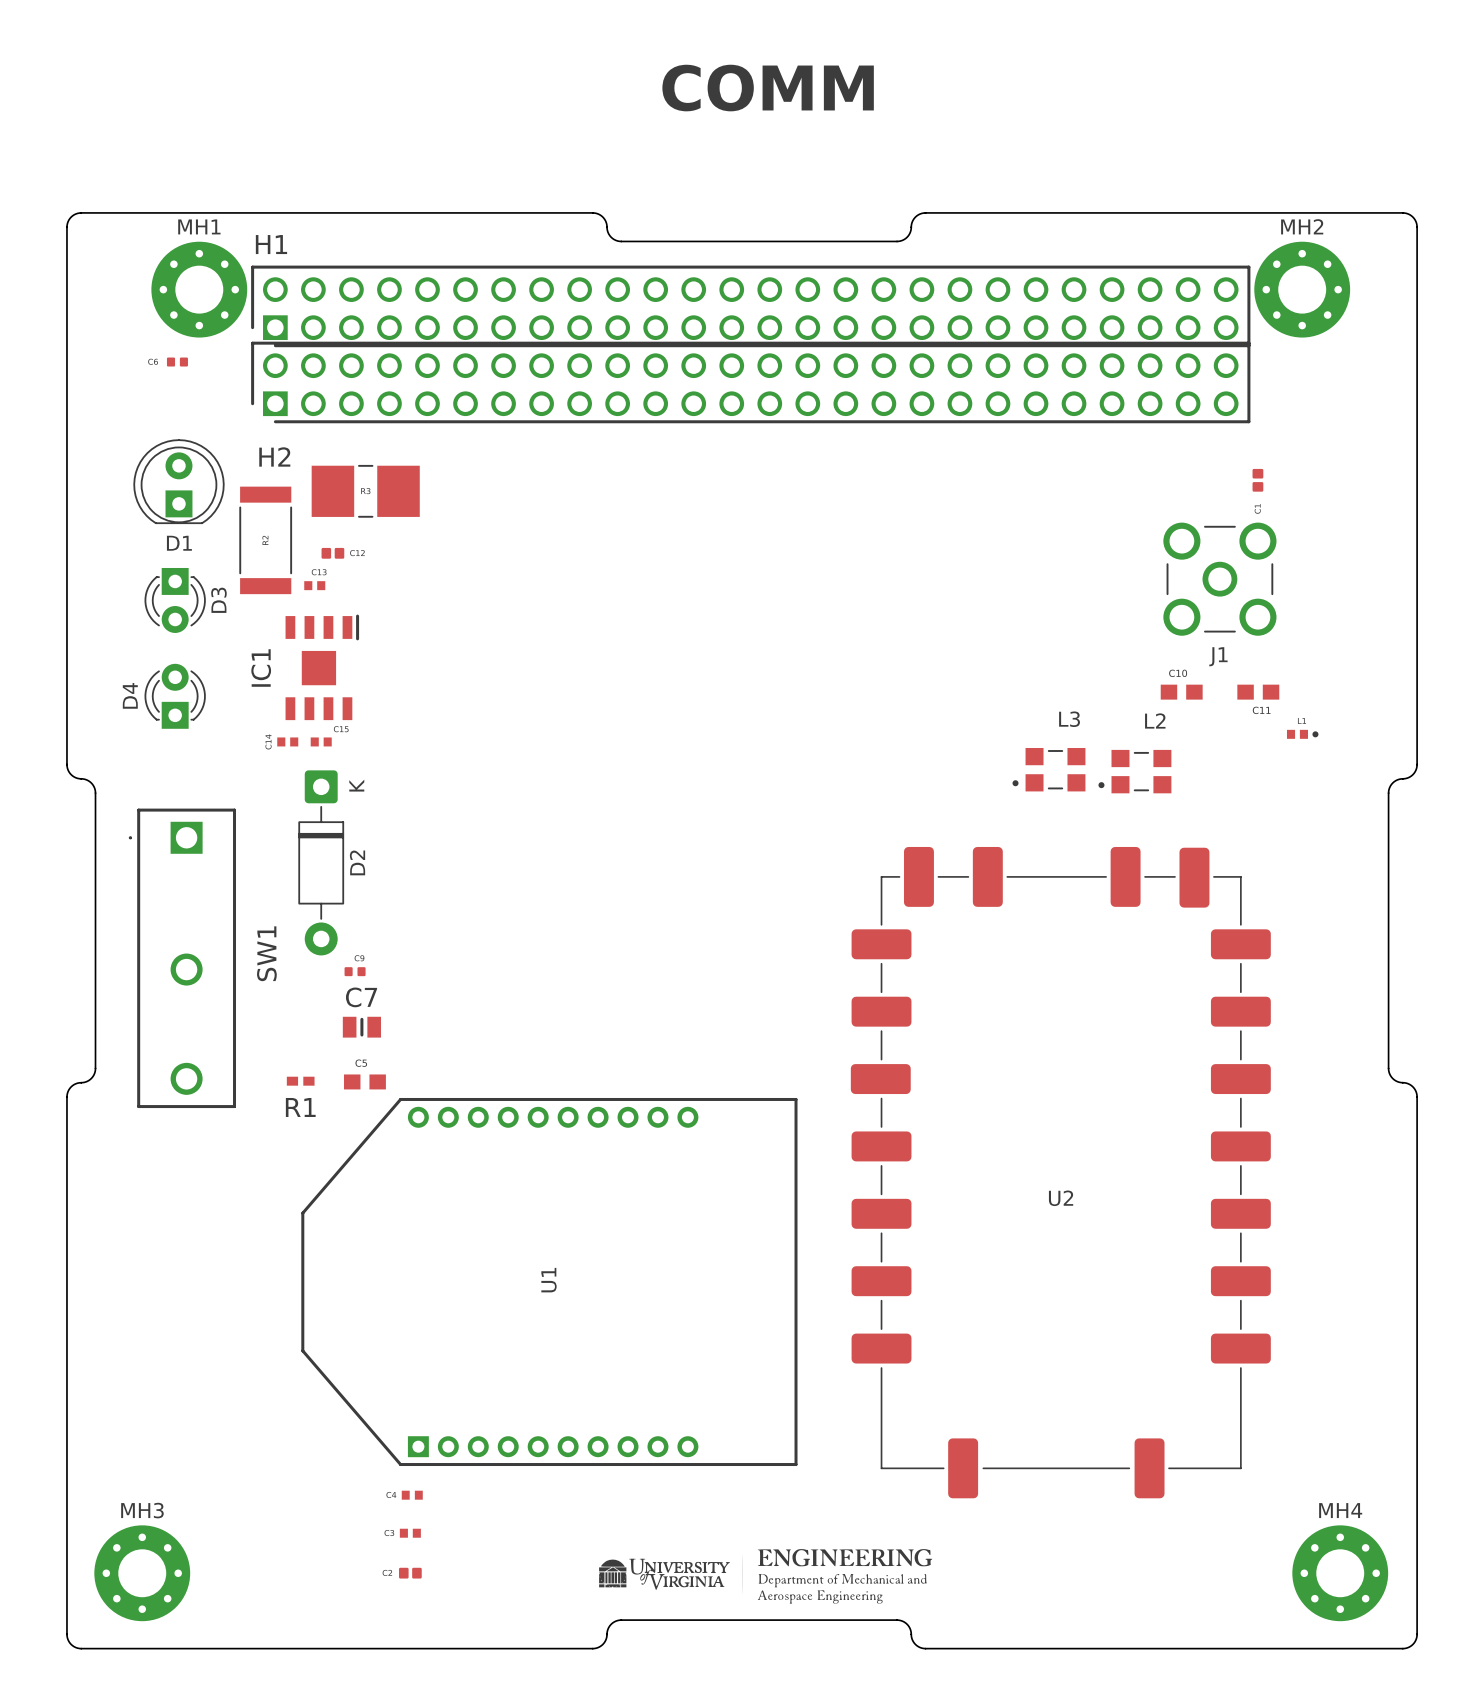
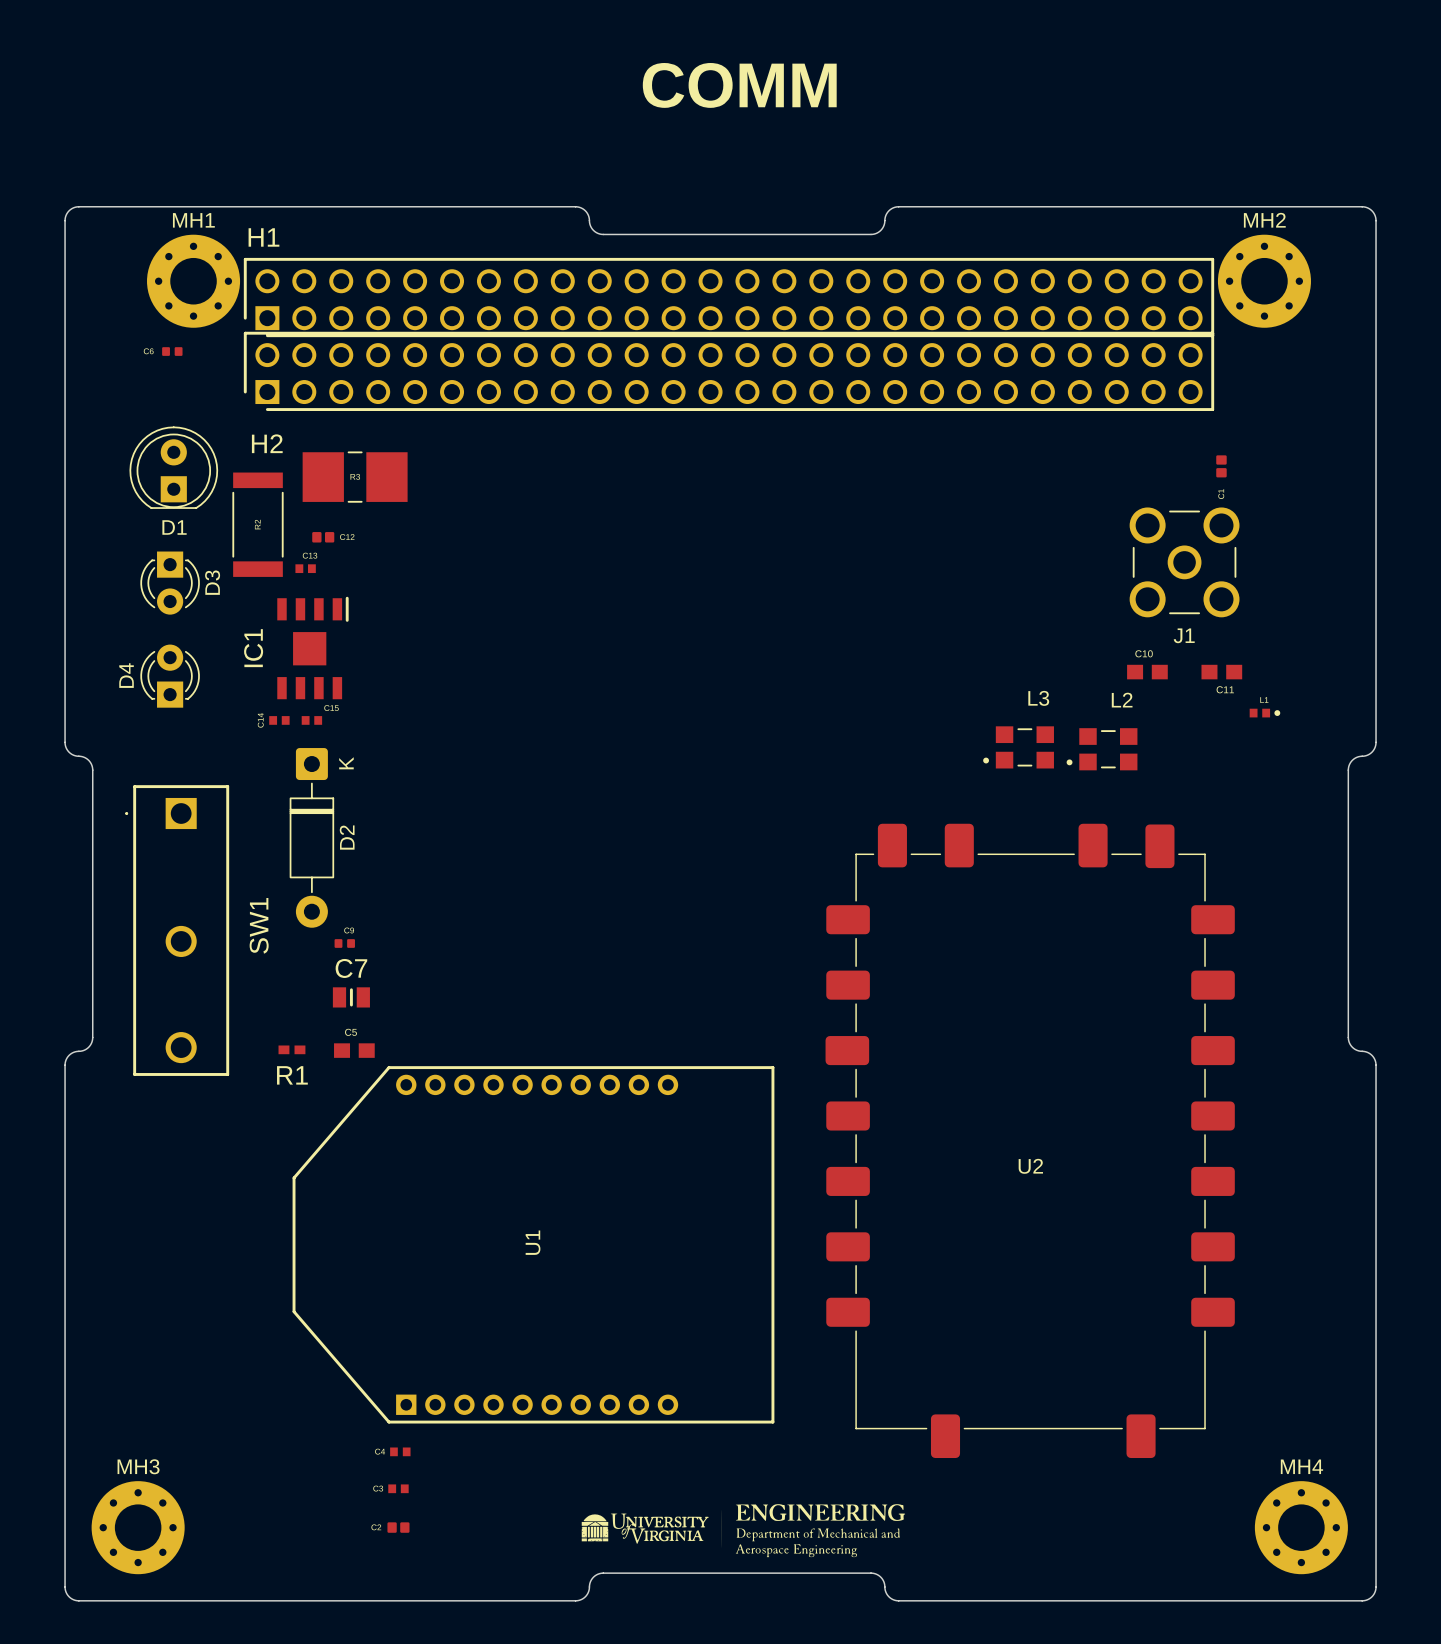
U2 footprint: [850, 846, 1271, 1499] -> [825, 823, 1235, 1459]

